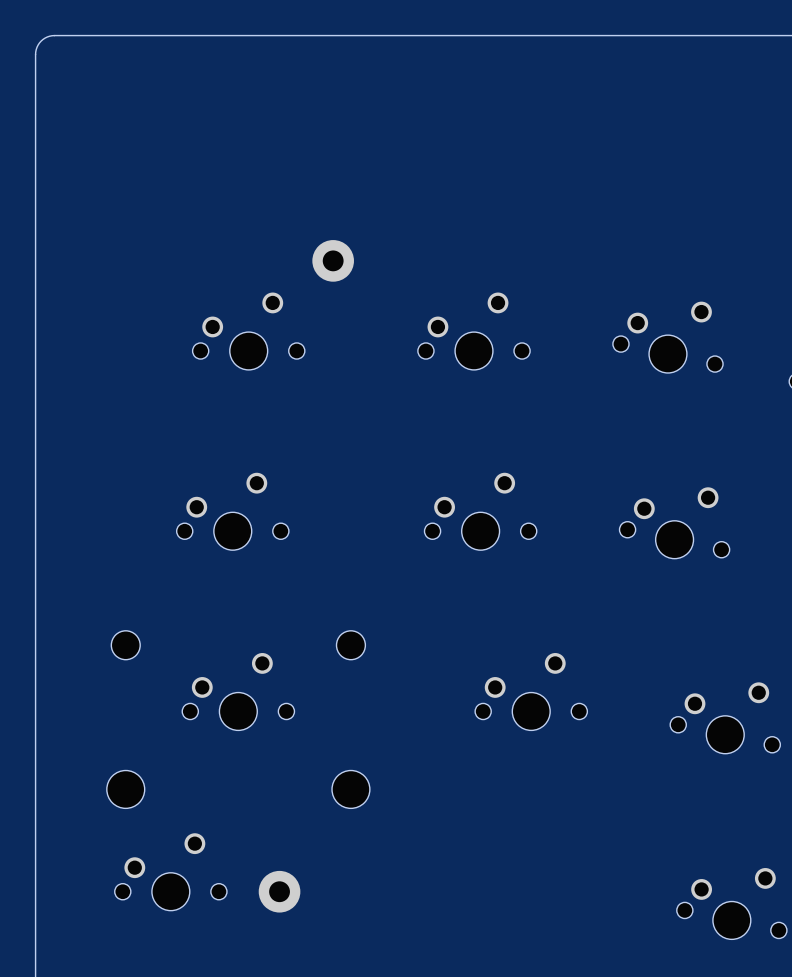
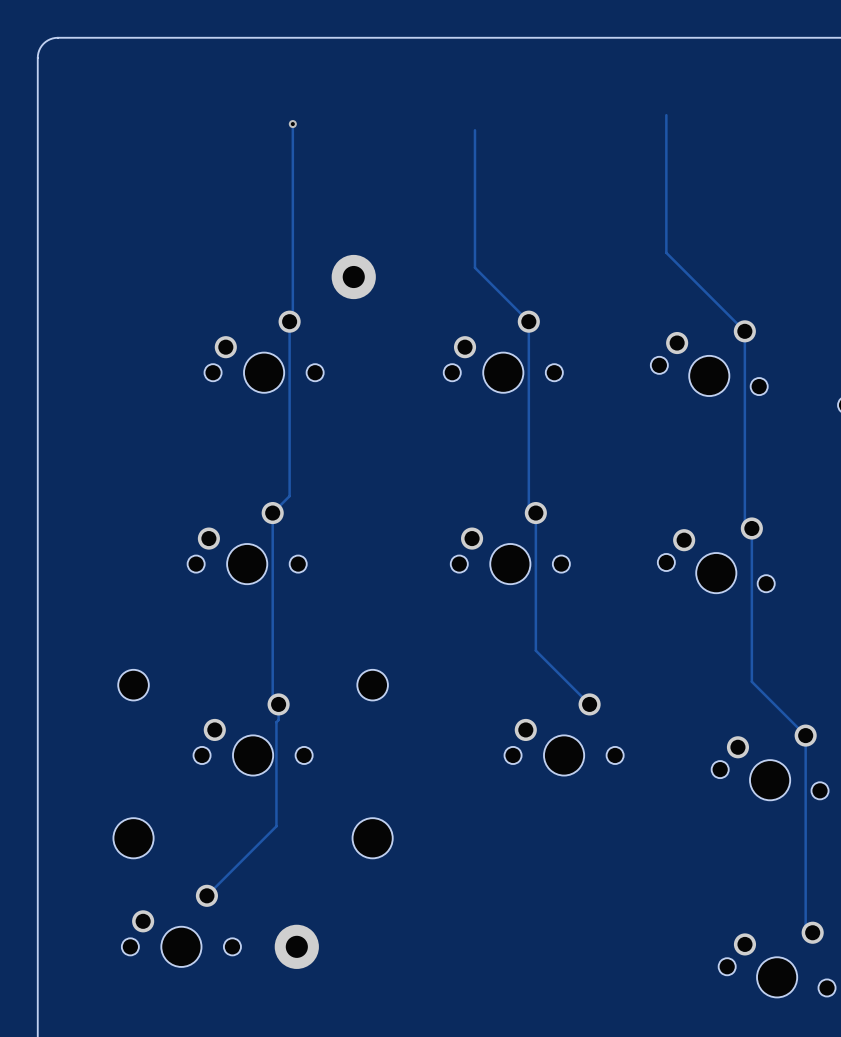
track: none -> (666, 115) (666, 252) (744, 331) (744, 521) (751, 528) (751, 681) (805, 735) (805, 925) (812, 932)
track: none -> (292, 124) (292, 318) (289, 321)
via: none -> (292, 124)
track: none -> (474, 130) (474, 267) (528, 321) (528, 506) (535, 513) (535, 650) (589, 704)
track: none -> (289, 321) (289, 496) (272, 513) (272, 698) (278, 704) (278, 720) (276, 722) (276, 826) (206, 895)

